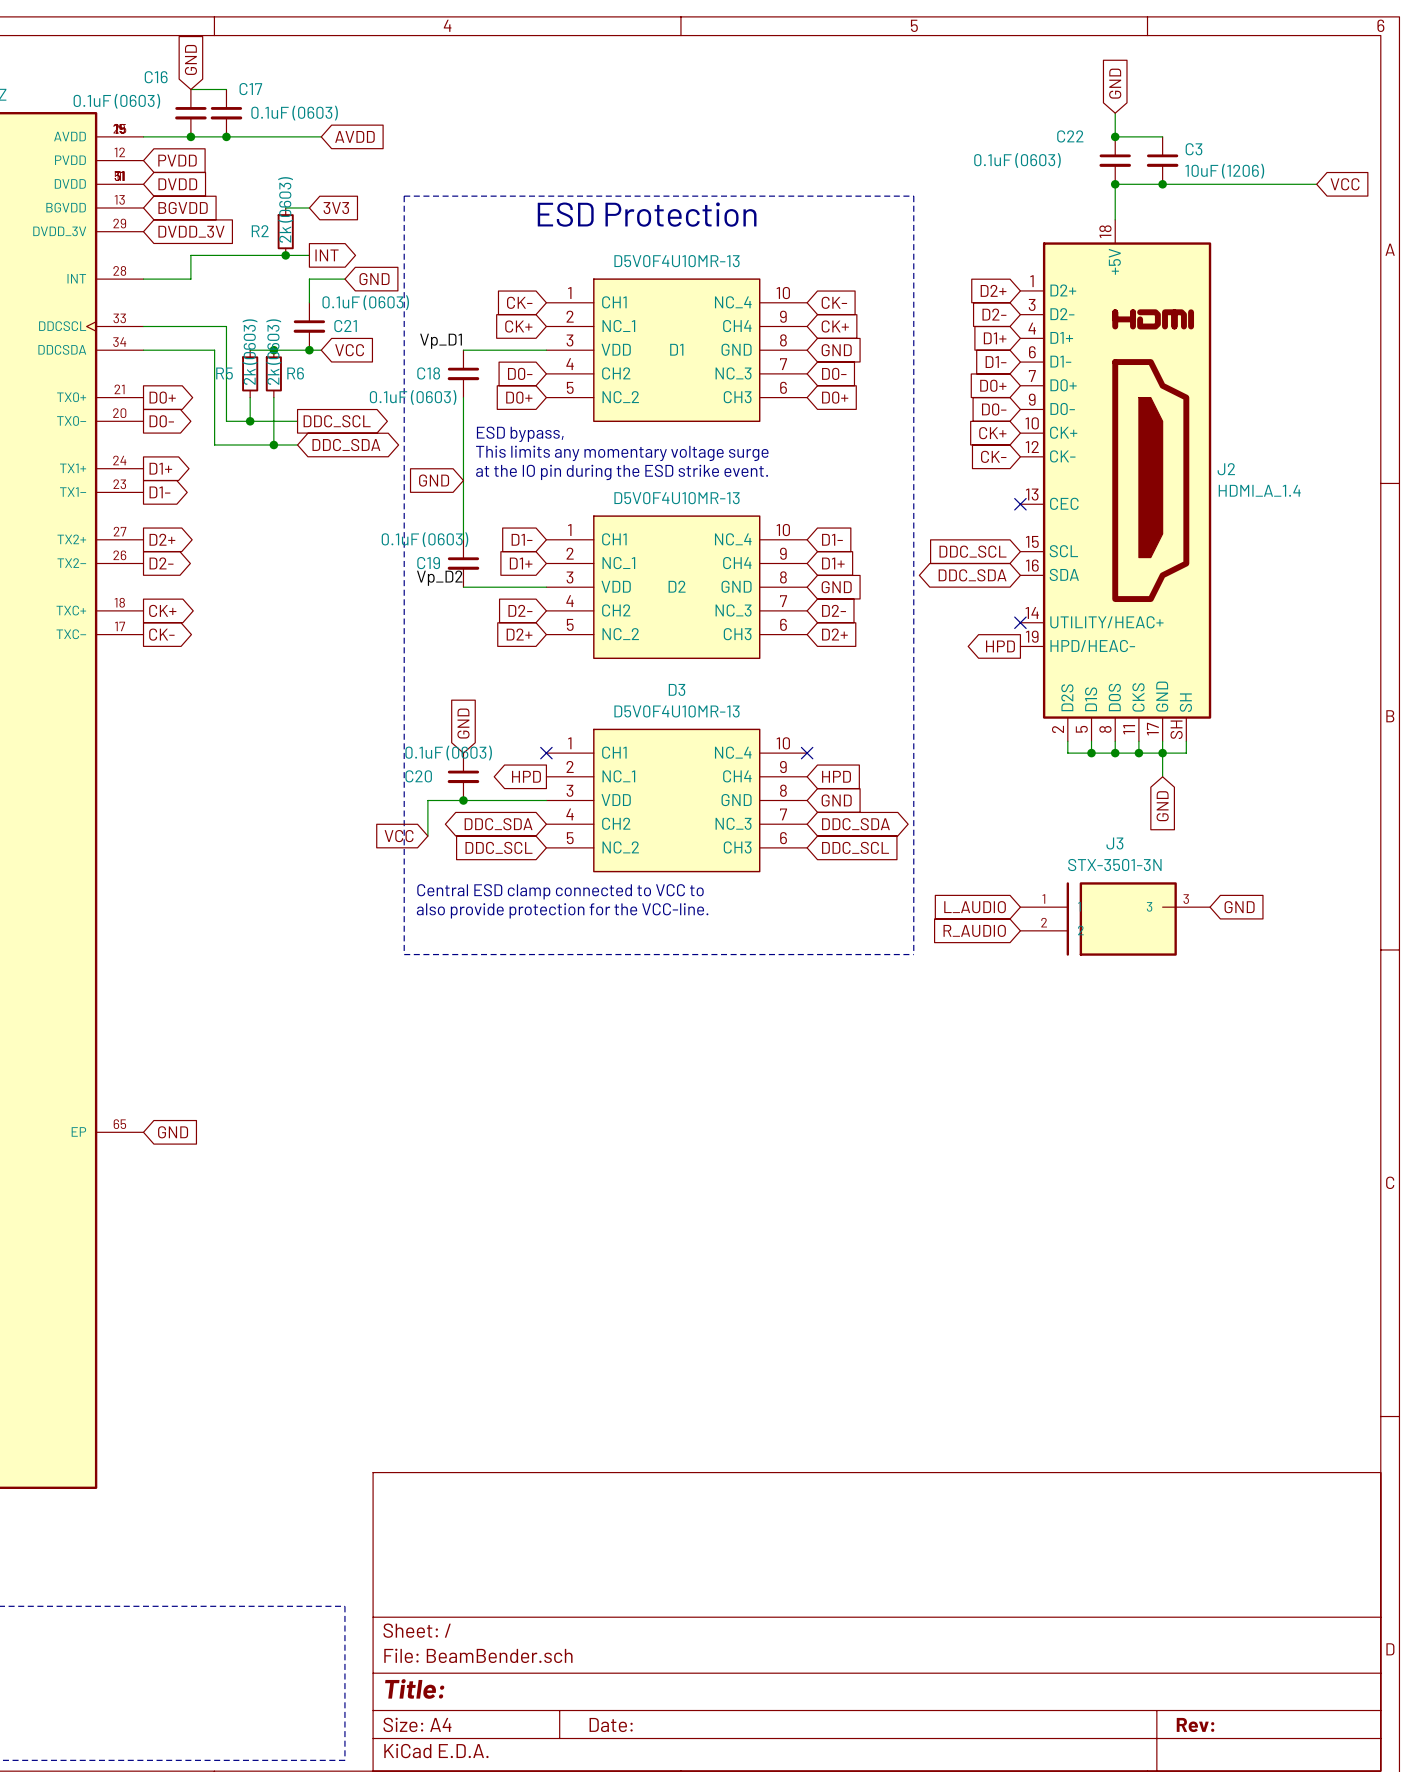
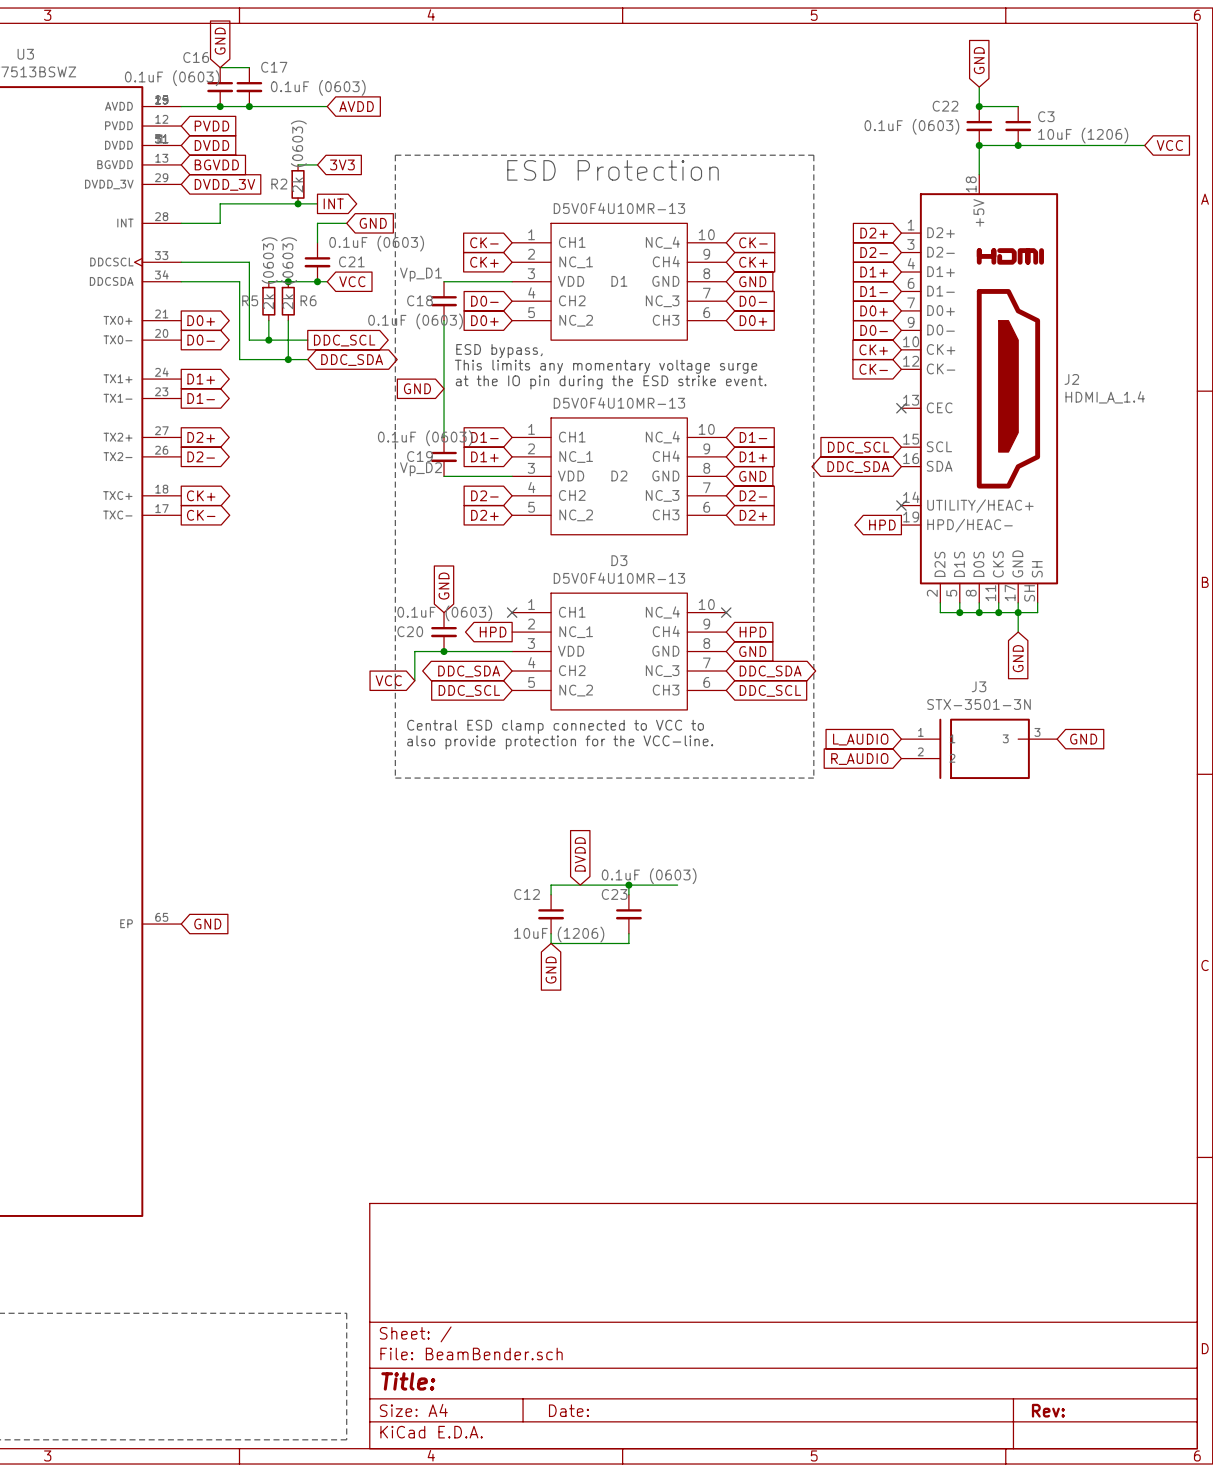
global label: none -> DVDD (580, 854)
wire: none -> (628, 885) (628, 894)
junction: none -> (628, 885)
wire: none -> (677, 885) (551, 885) (551, 894)
C12: none -> 10uF (1206) (551, 914)
C23: none -> 0.1uF (0603) (628, 914)
wire: none -> (551, 933) (551, 943) (628, 943) (628, 933)
global label: none -> GND (551, 970)

